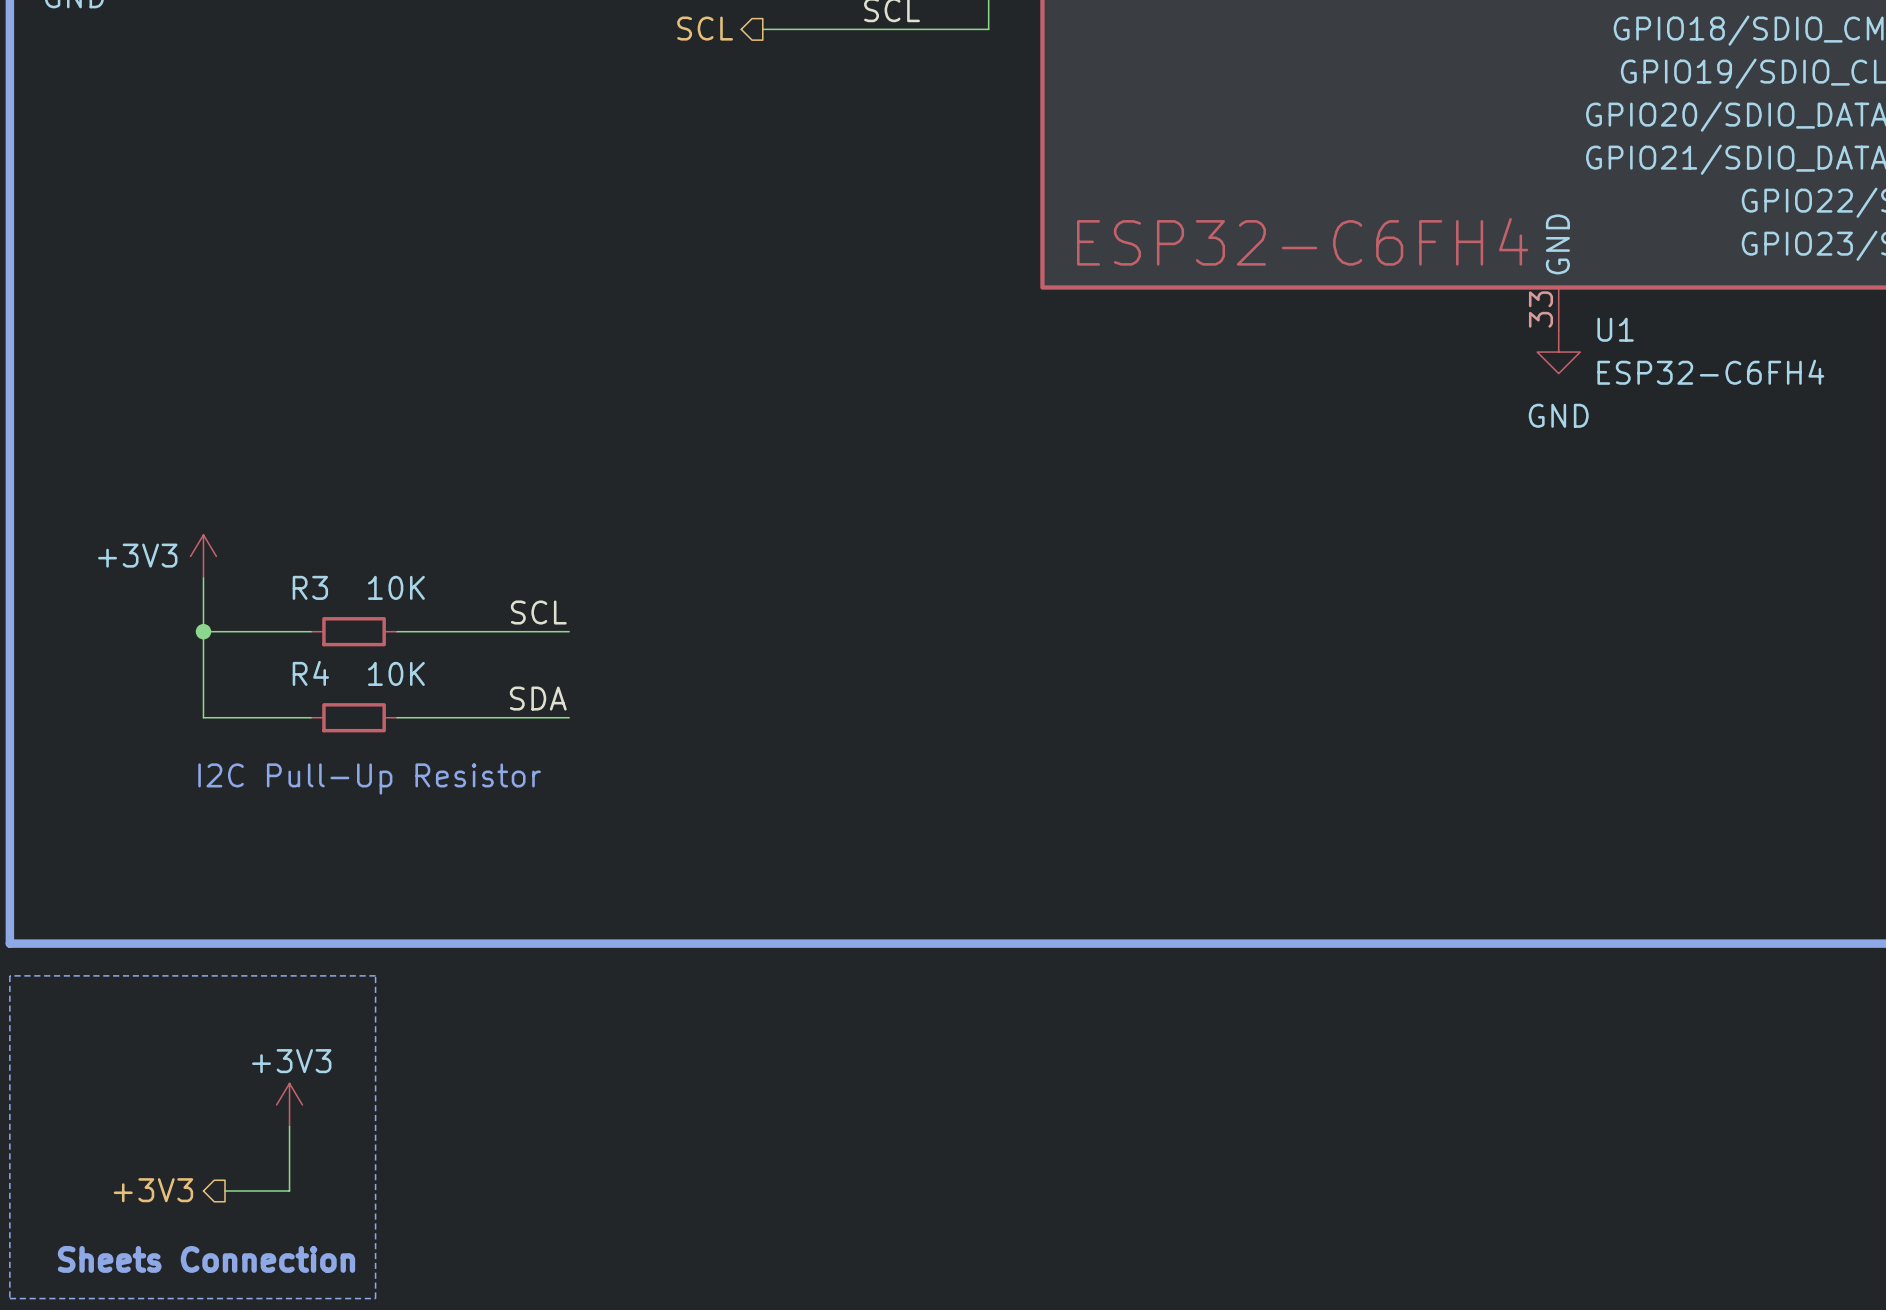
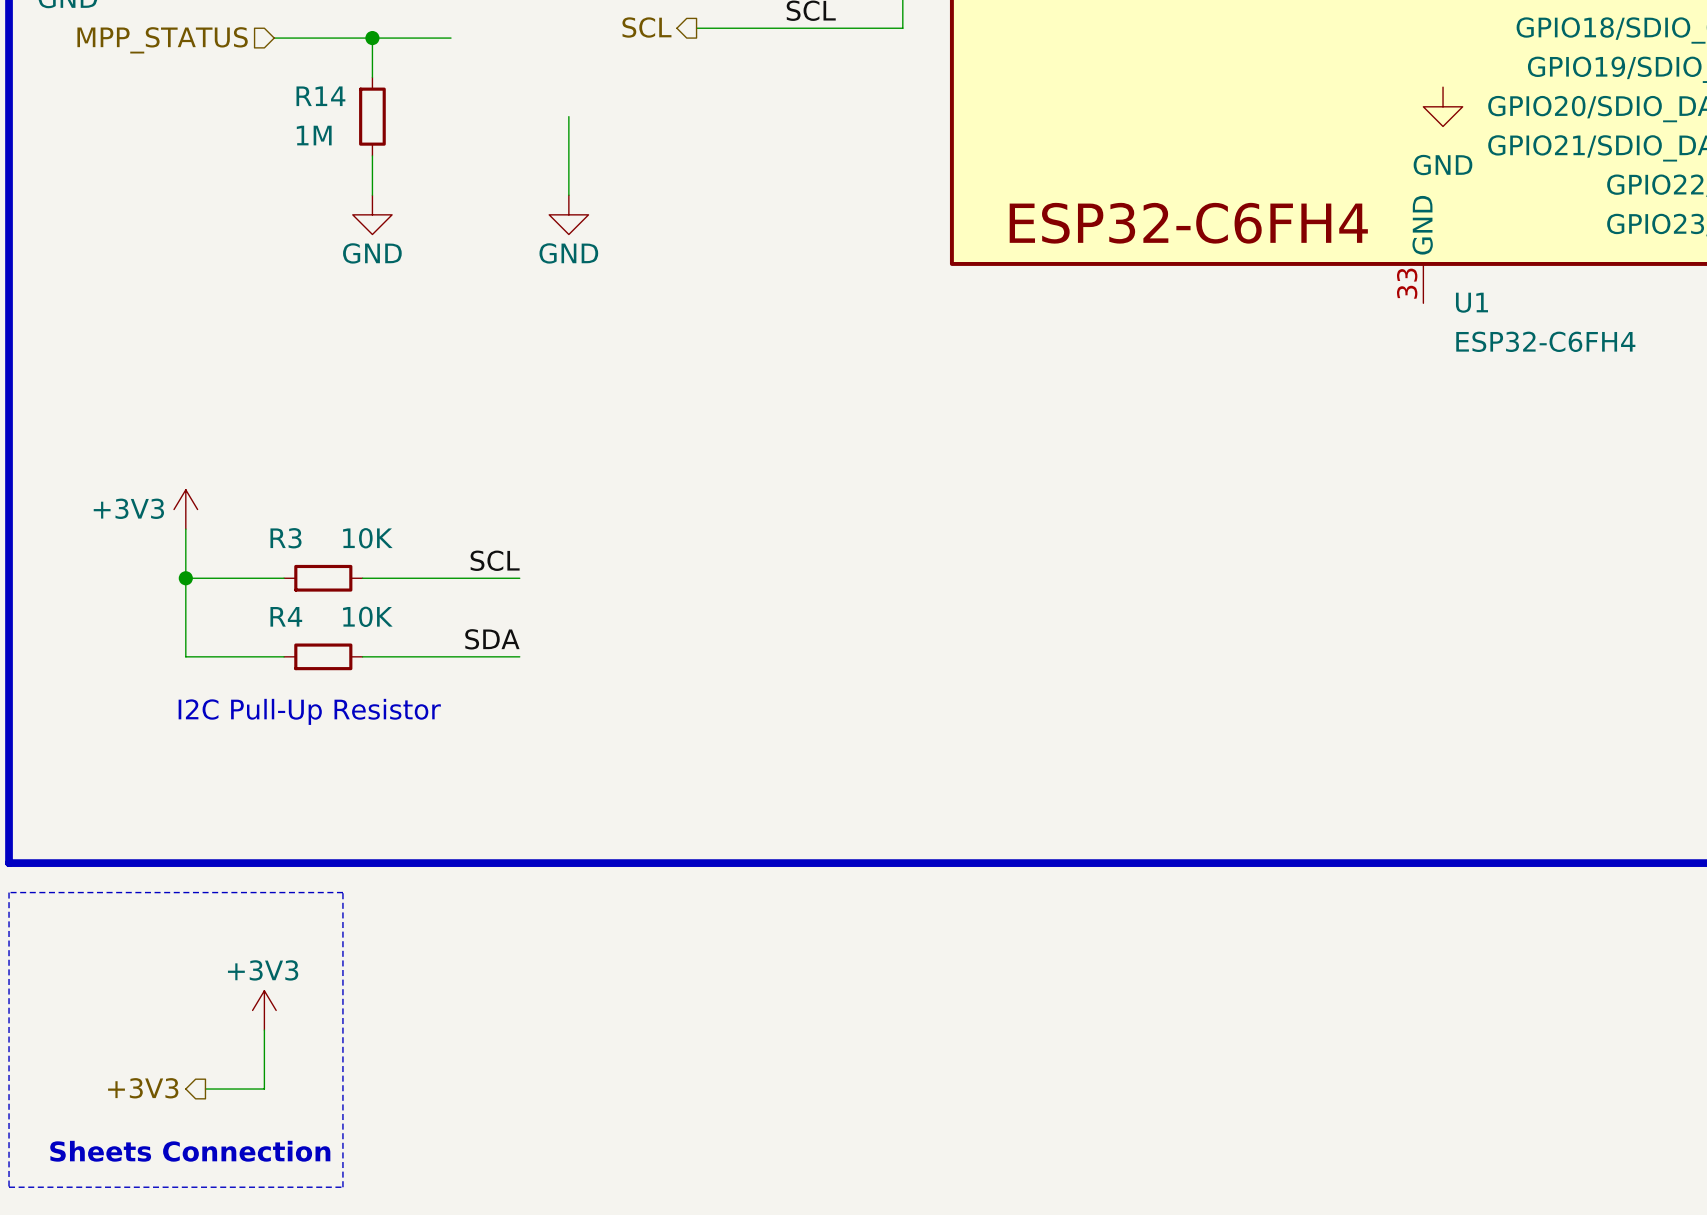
hierarchical label: none -> MPP_STATUS (162, 40)
wire: none -> (274, 38) (451, 38)
wire: none -> (372, 38) (372, 77)
junction: none -> (372, 38)
R14: none -> 1M (372, 116)
wire: none -> (568, 116) (568, 195)
wire: none -> (372, 155) (372, 195)
power symbol: none -> GND (372, 214)
power symbol: none -> GND (568, 214)
power symbol position: GND (1558, 352) -> GND (1443, 106)

